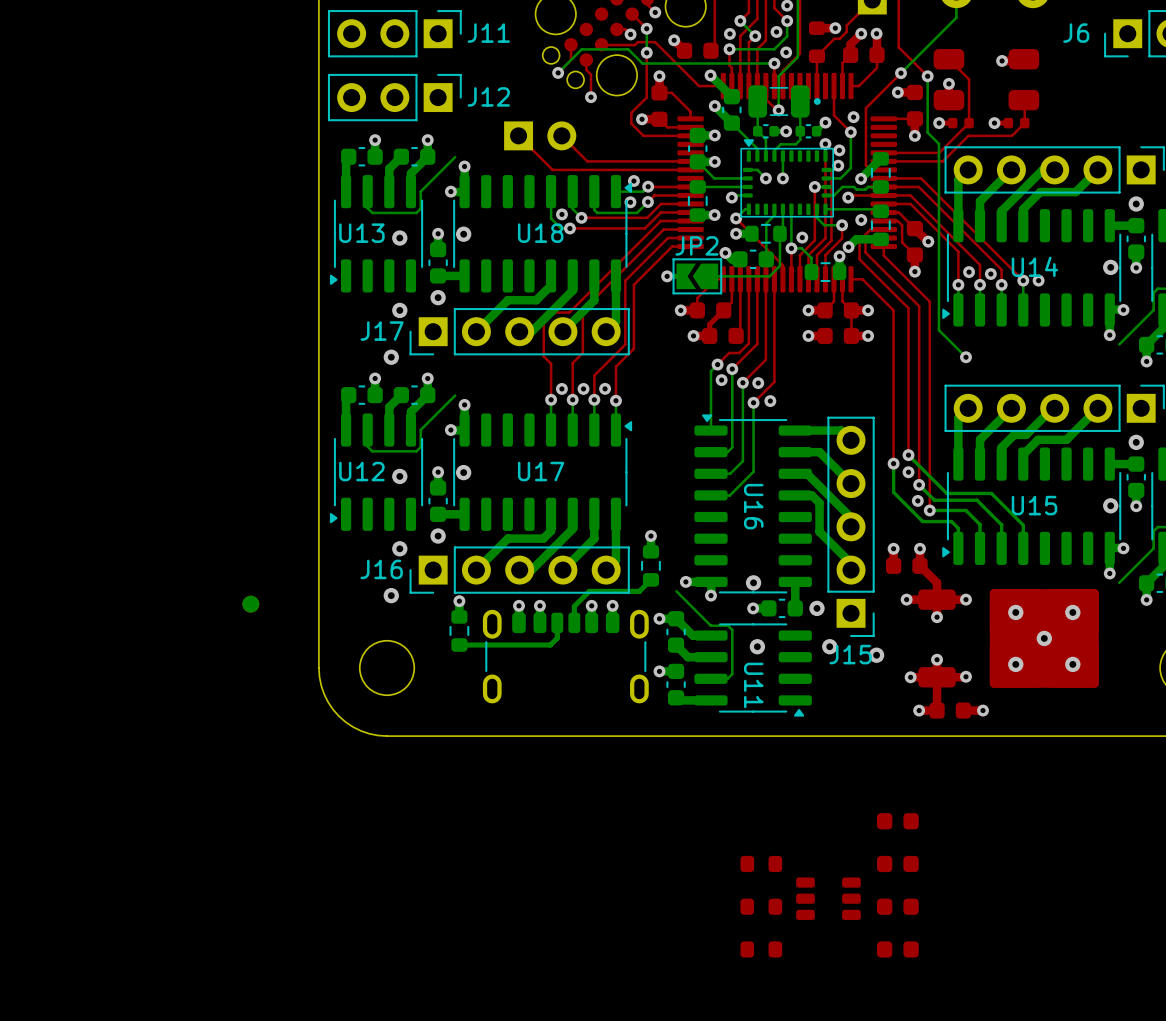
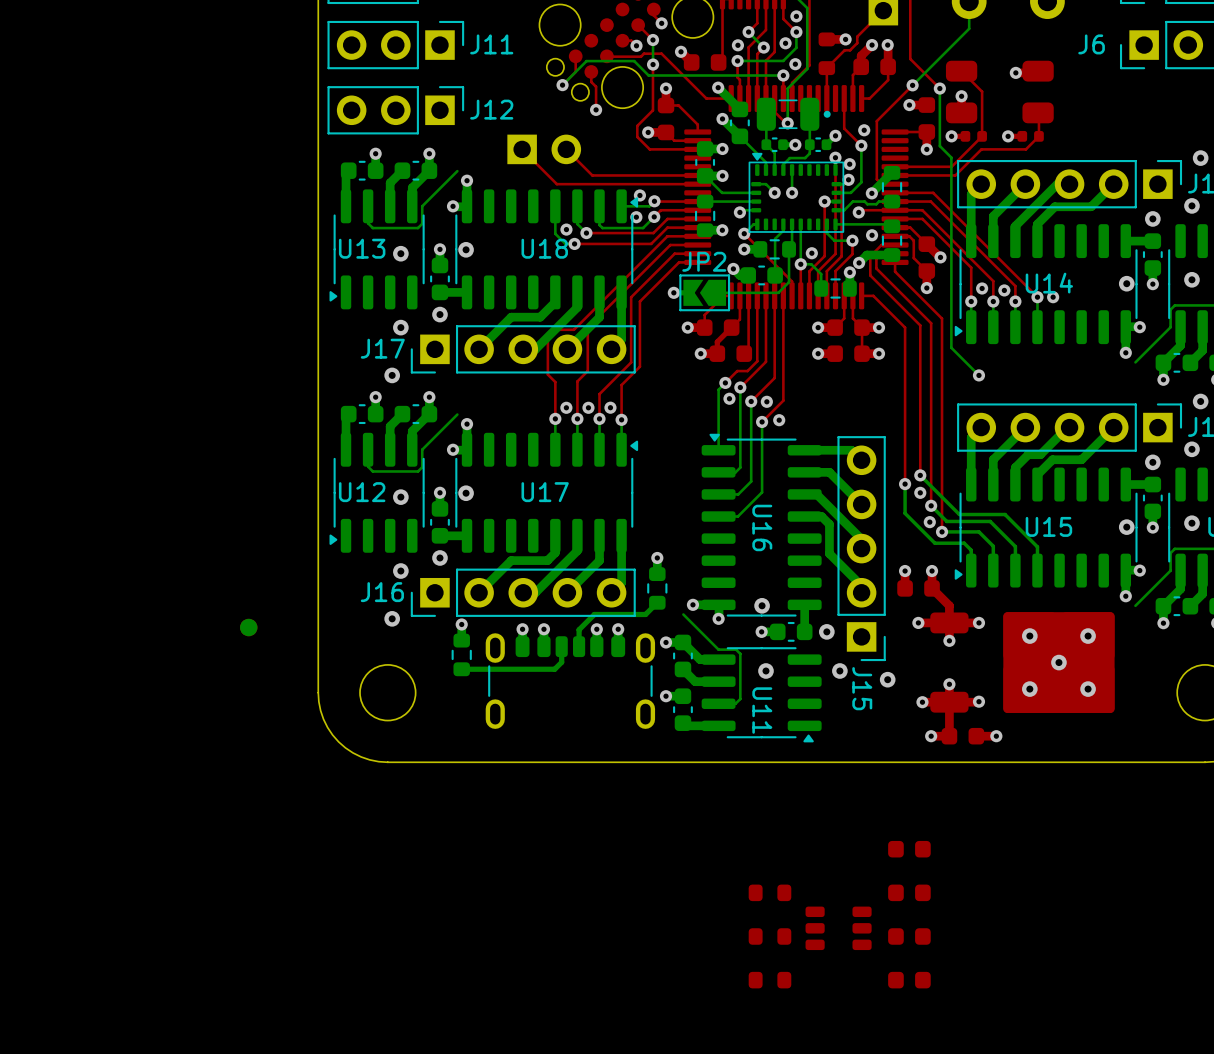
J15 name rotation: 0° (850, 654) -> 90° clockwise (862, 688)

